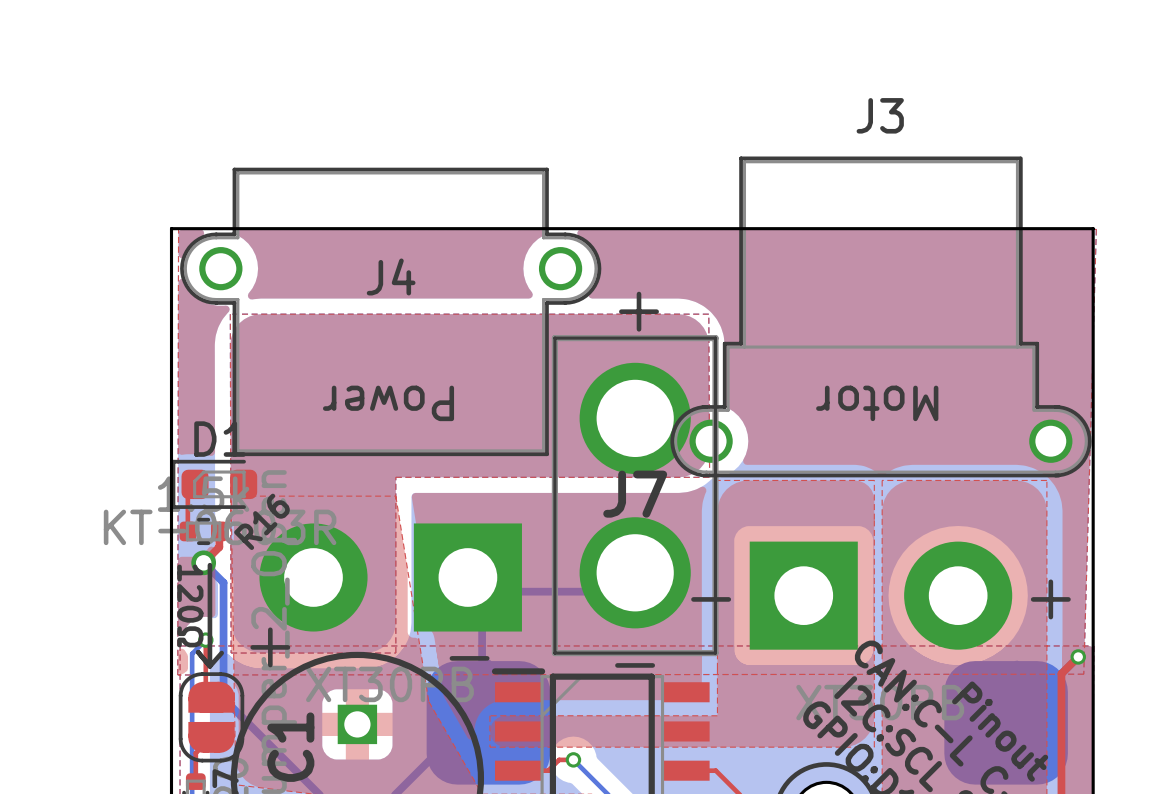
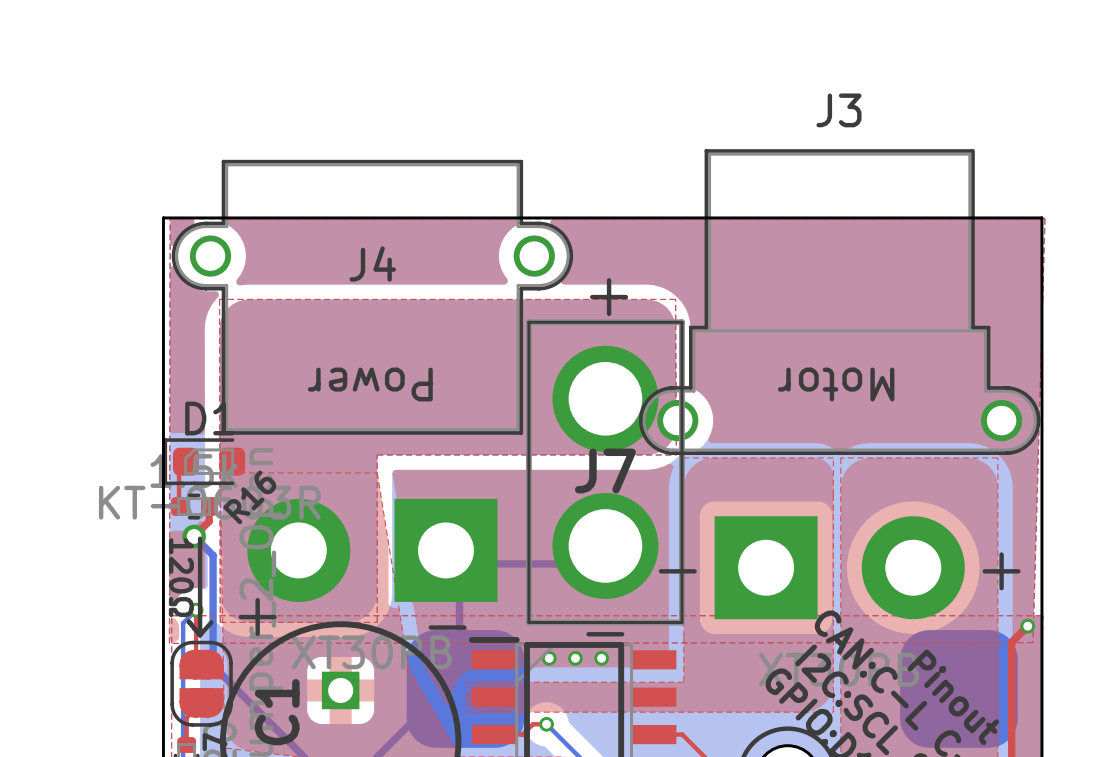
via: none -> (549, 658)
via: none -> (575, 658)
via: none -> (601, 658)

